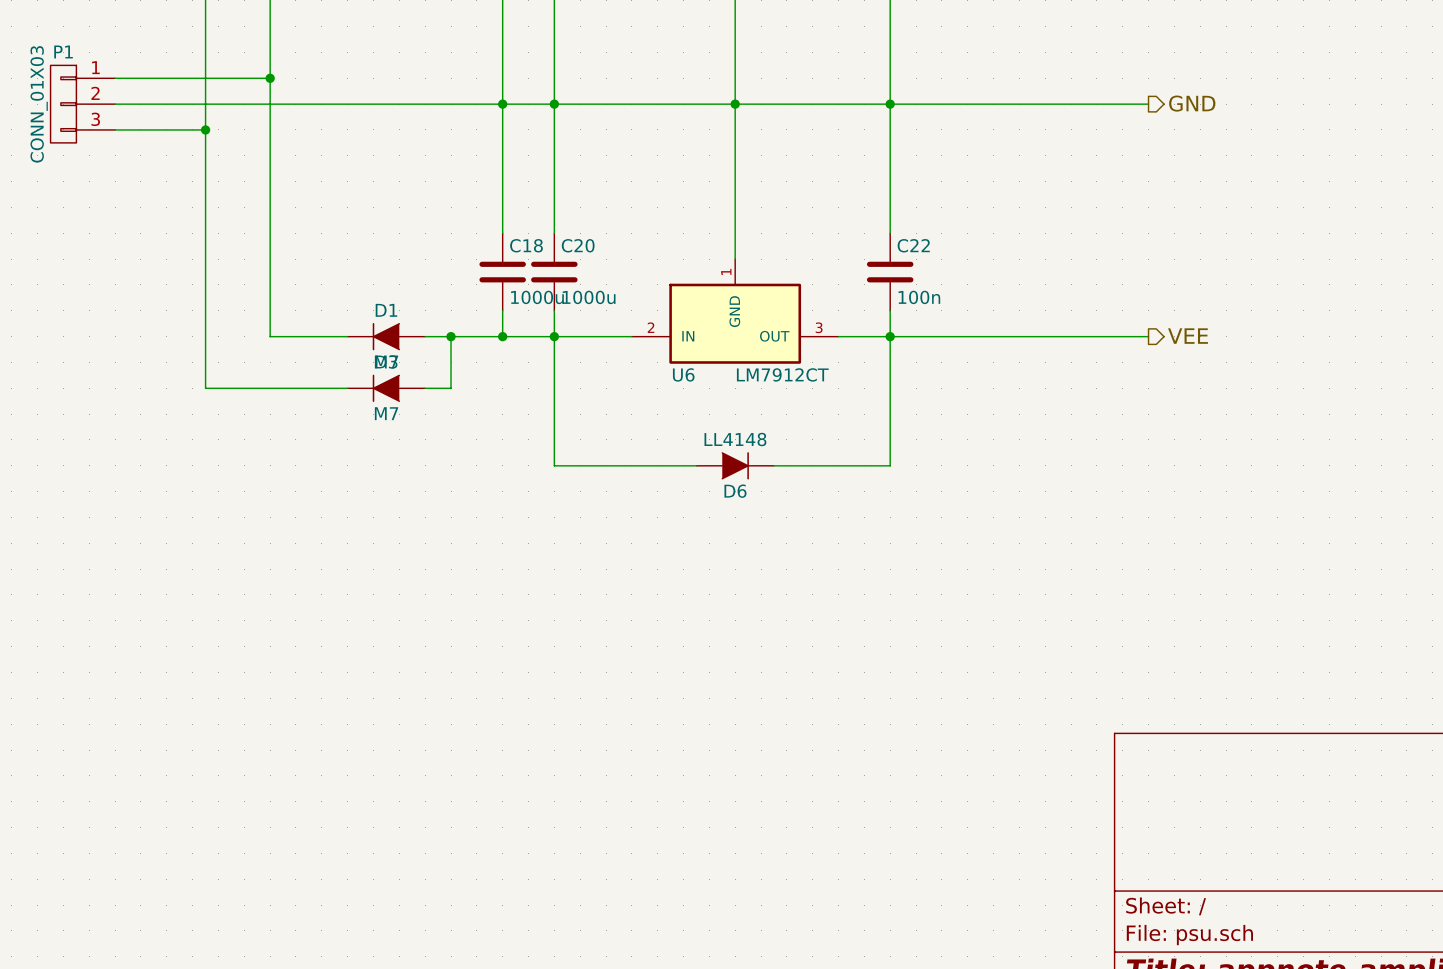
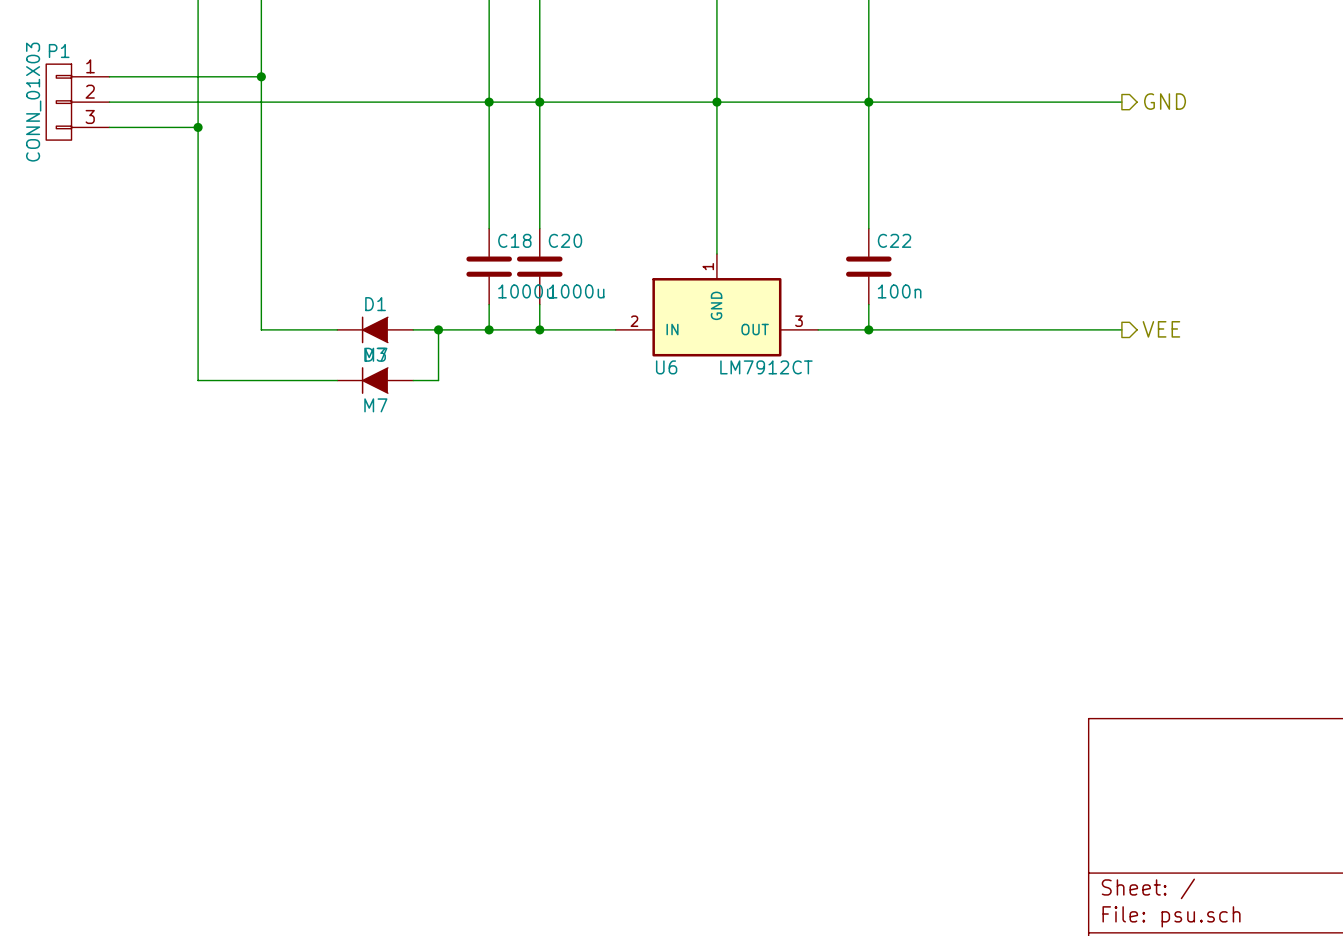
wire: (554, 336) (554, 465) (696, 465) -> none
wire: (890, 336) (890, 465) (773, 465) -> none
D6: LL4148 (735, 465) -> none

